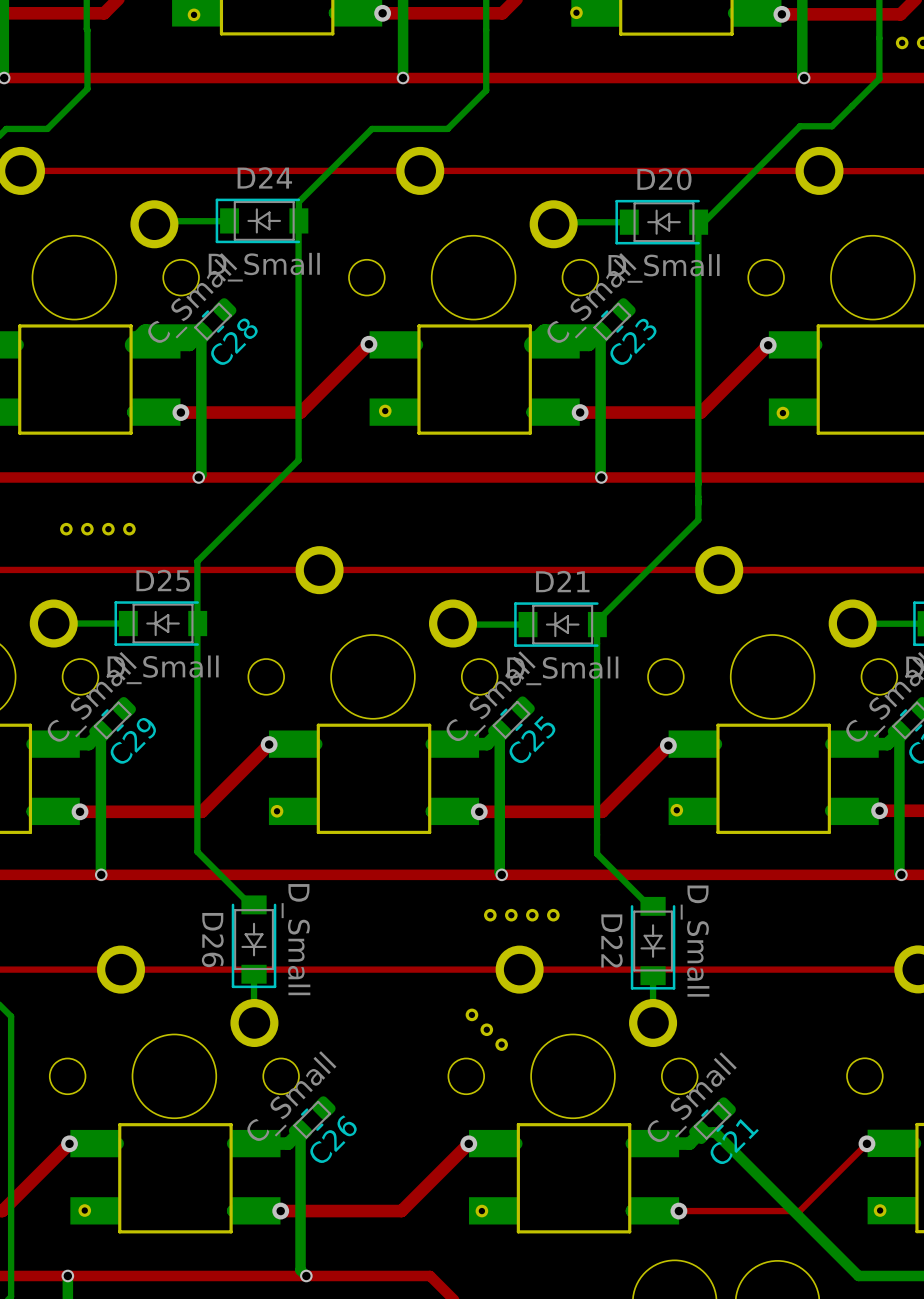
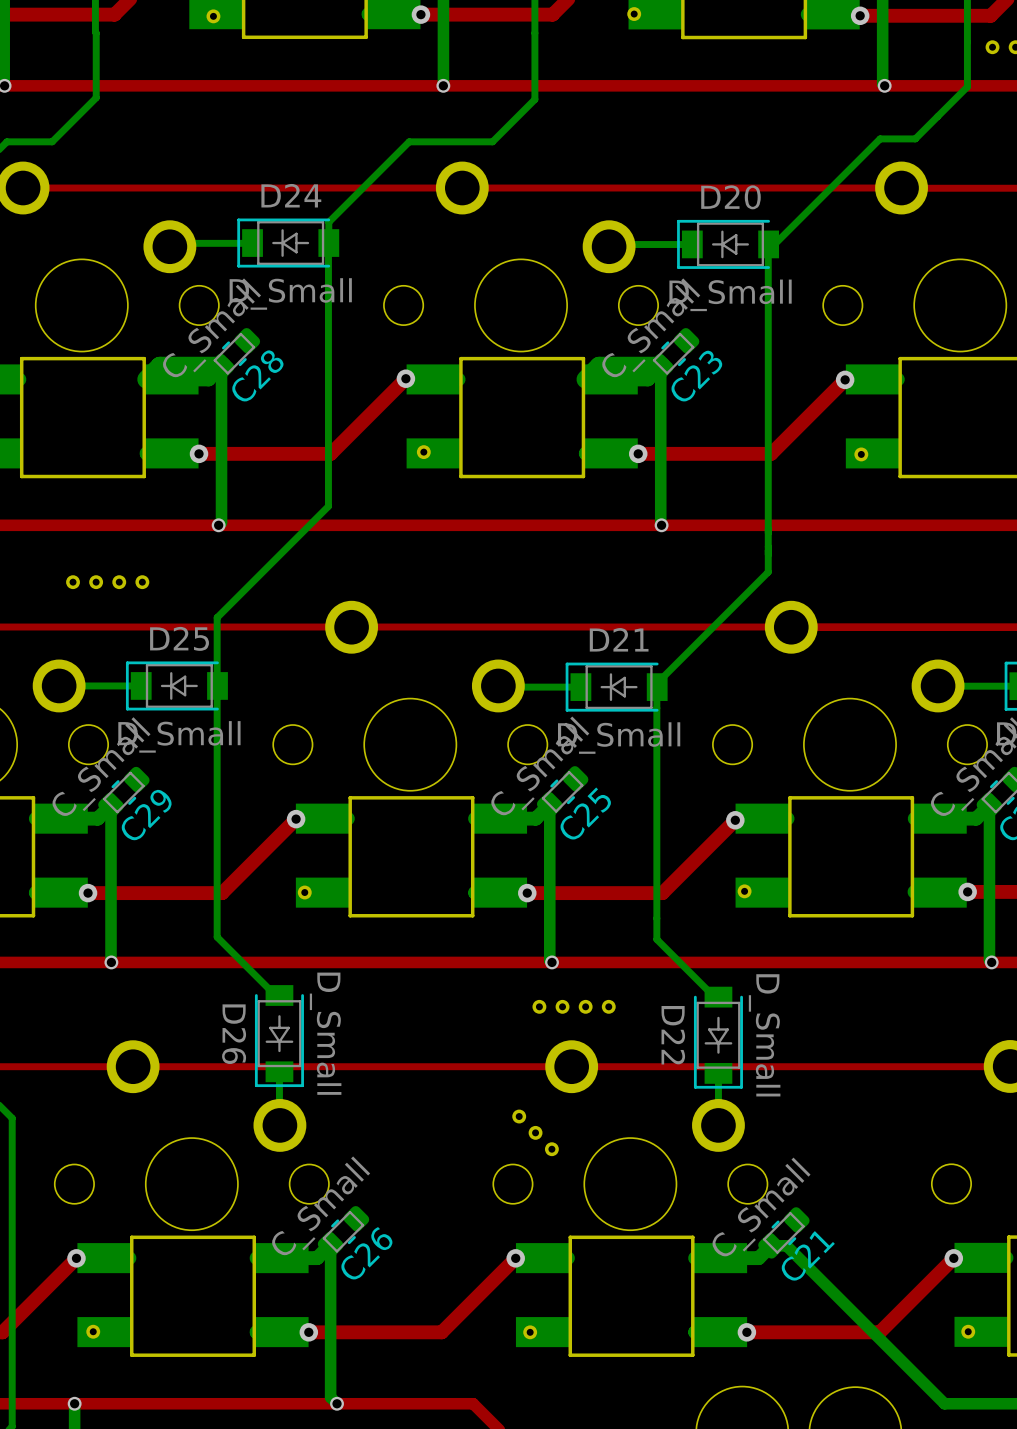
top track width: thin (866, 1143) (799, 1211) (678, 1211) -> thick (953, 1258) (879, 1332) (746, 1332)

